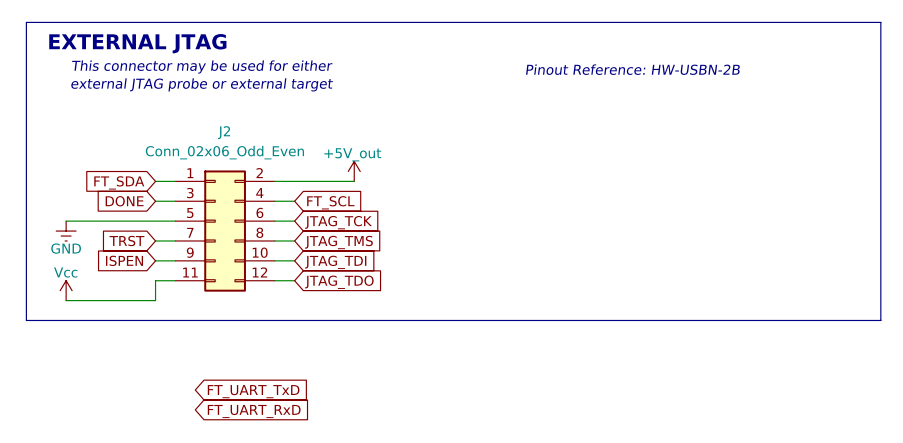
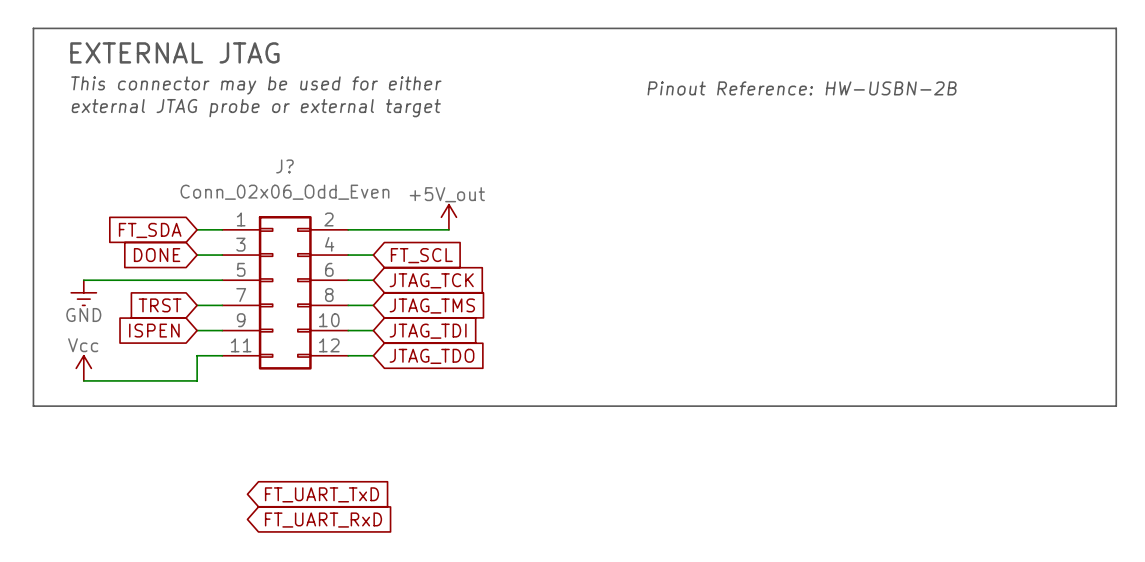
J2 name: J2 (224, 132) -> J? (284, 166)

